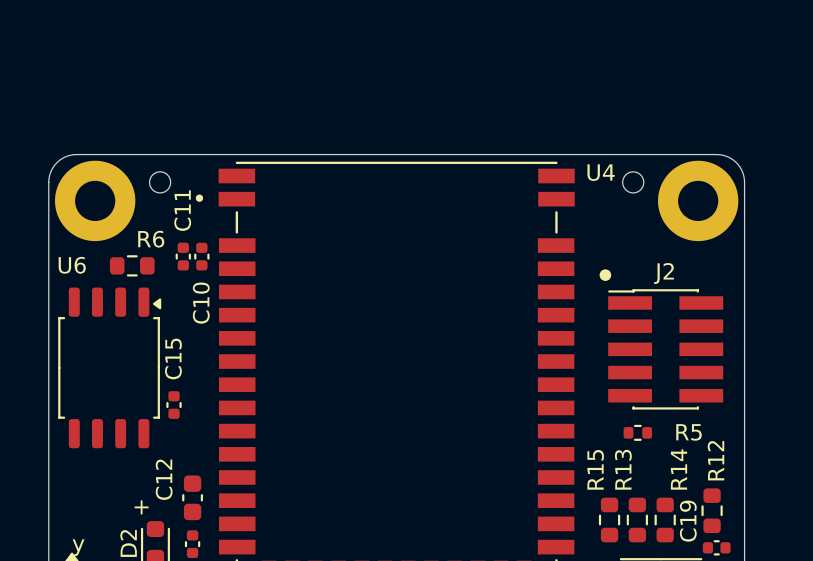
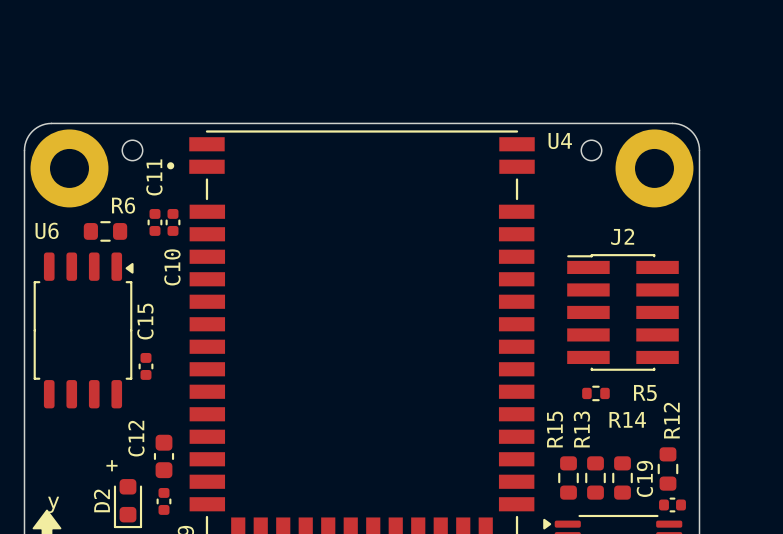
drawing: [599, 269, 612, 281] -> none
R14 name rotation: 0° (679, 469) -> 90° clockwise (627, 419)

